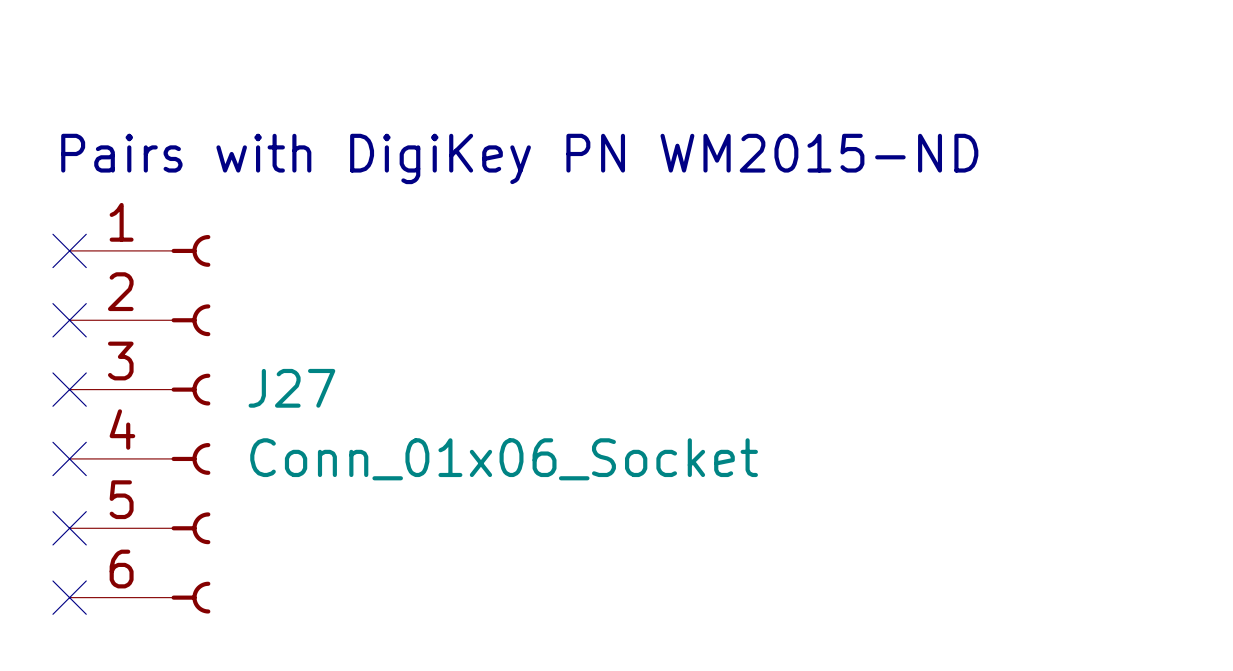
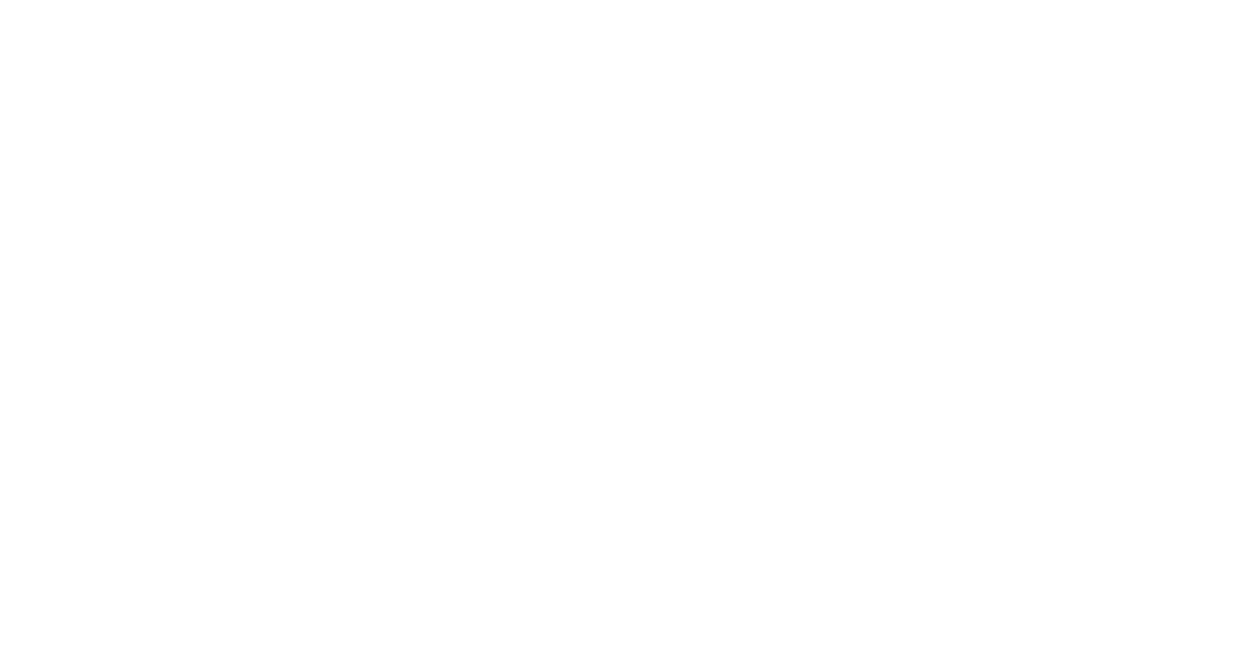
text: Pairs with DigiKey PN WM2015-ND (519, 158) -> none
no-connect mark: (69, 250) -> none
no-connect mark: (69, 320) -> none
no-connect mark: (69, 389) -> none
J27: Conn_01x06_Socket (139, 424) -> none
no-connect mark: (69, 458) -> none
no-connect mark: (69, 528) -> none
no-connect mark: (69, 597) -> none

